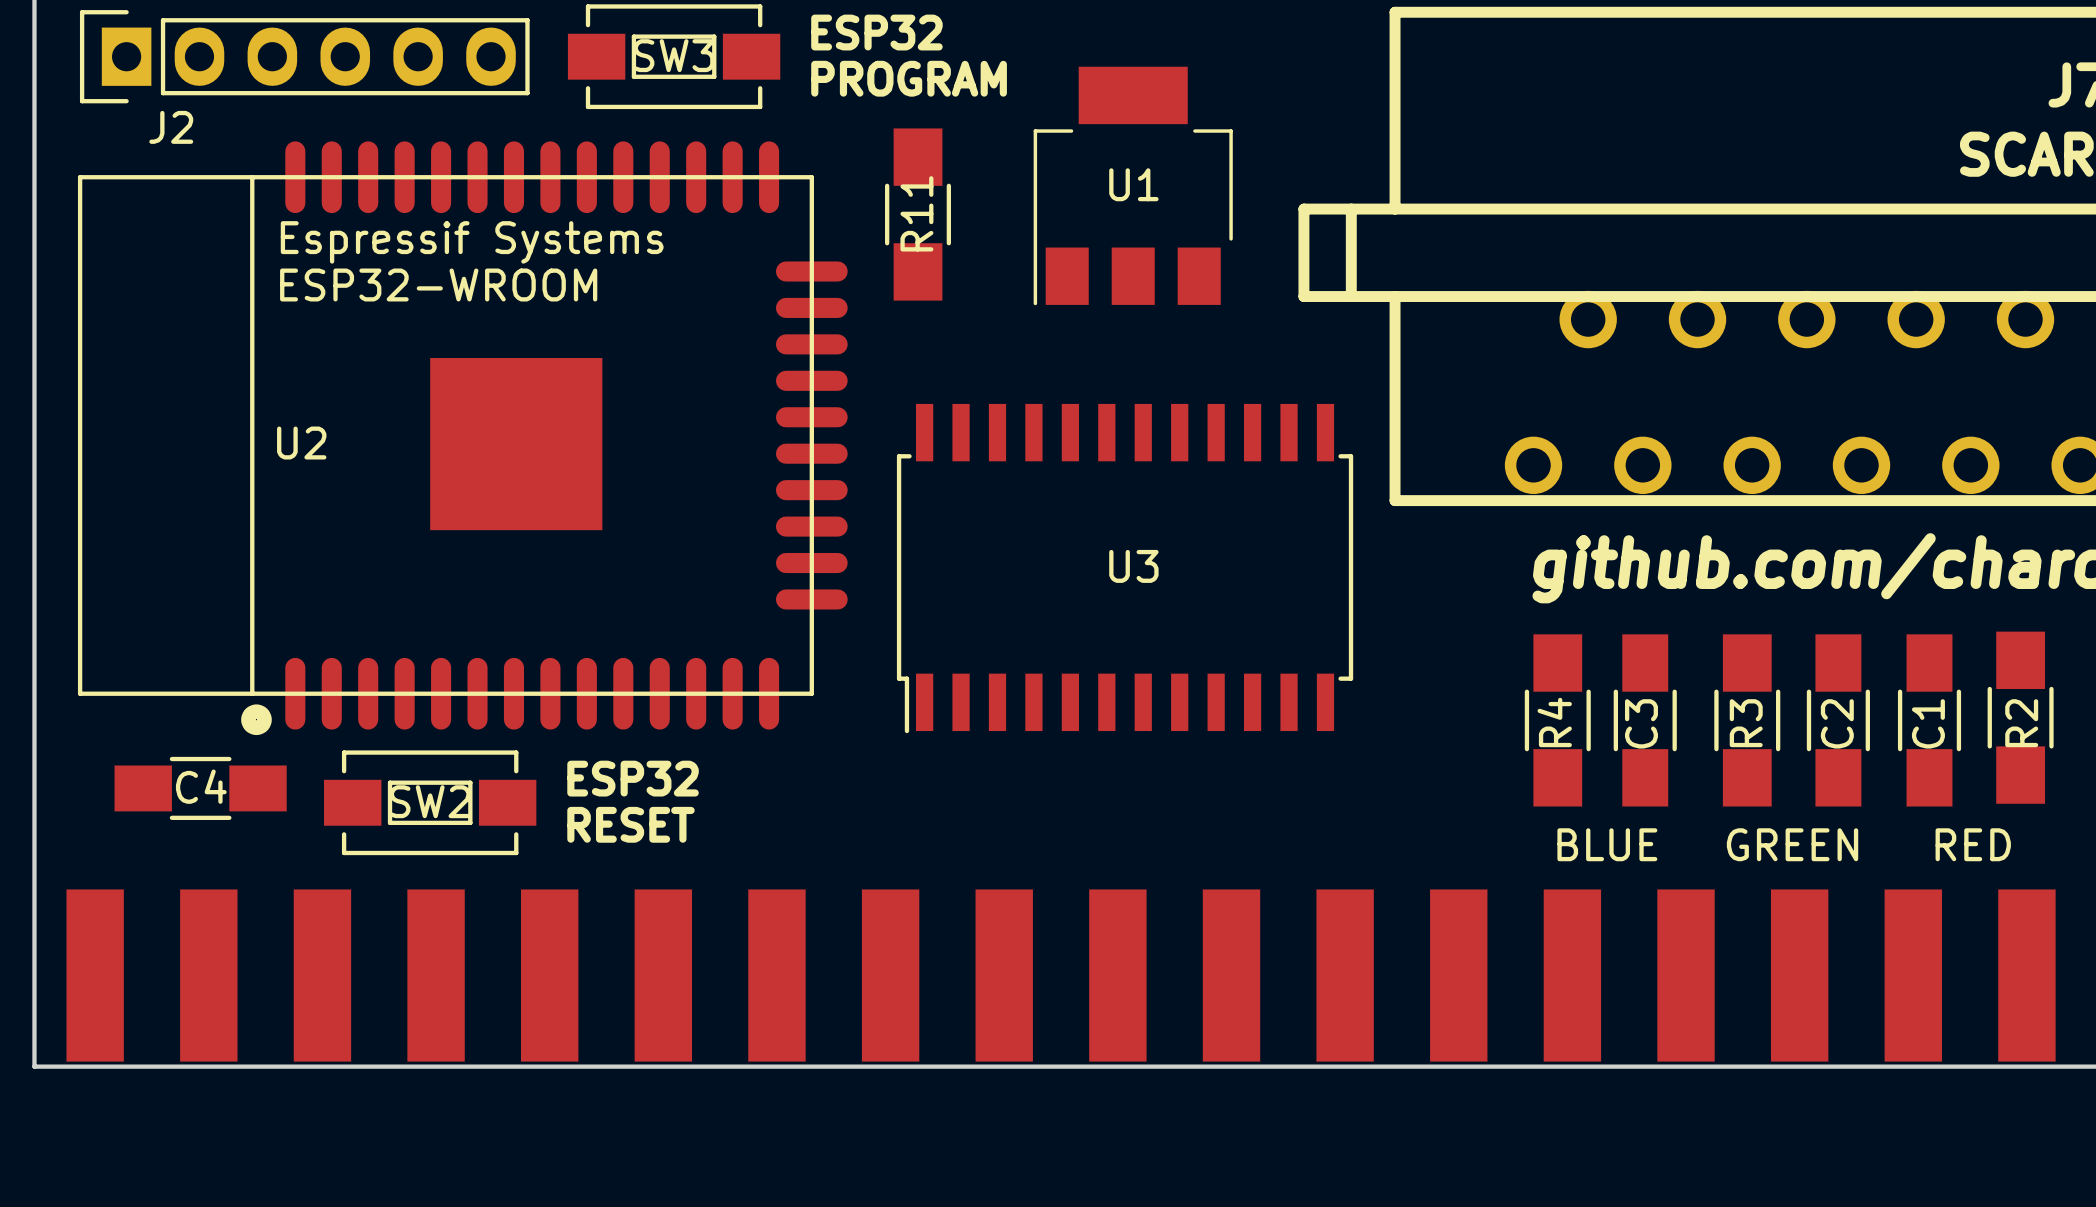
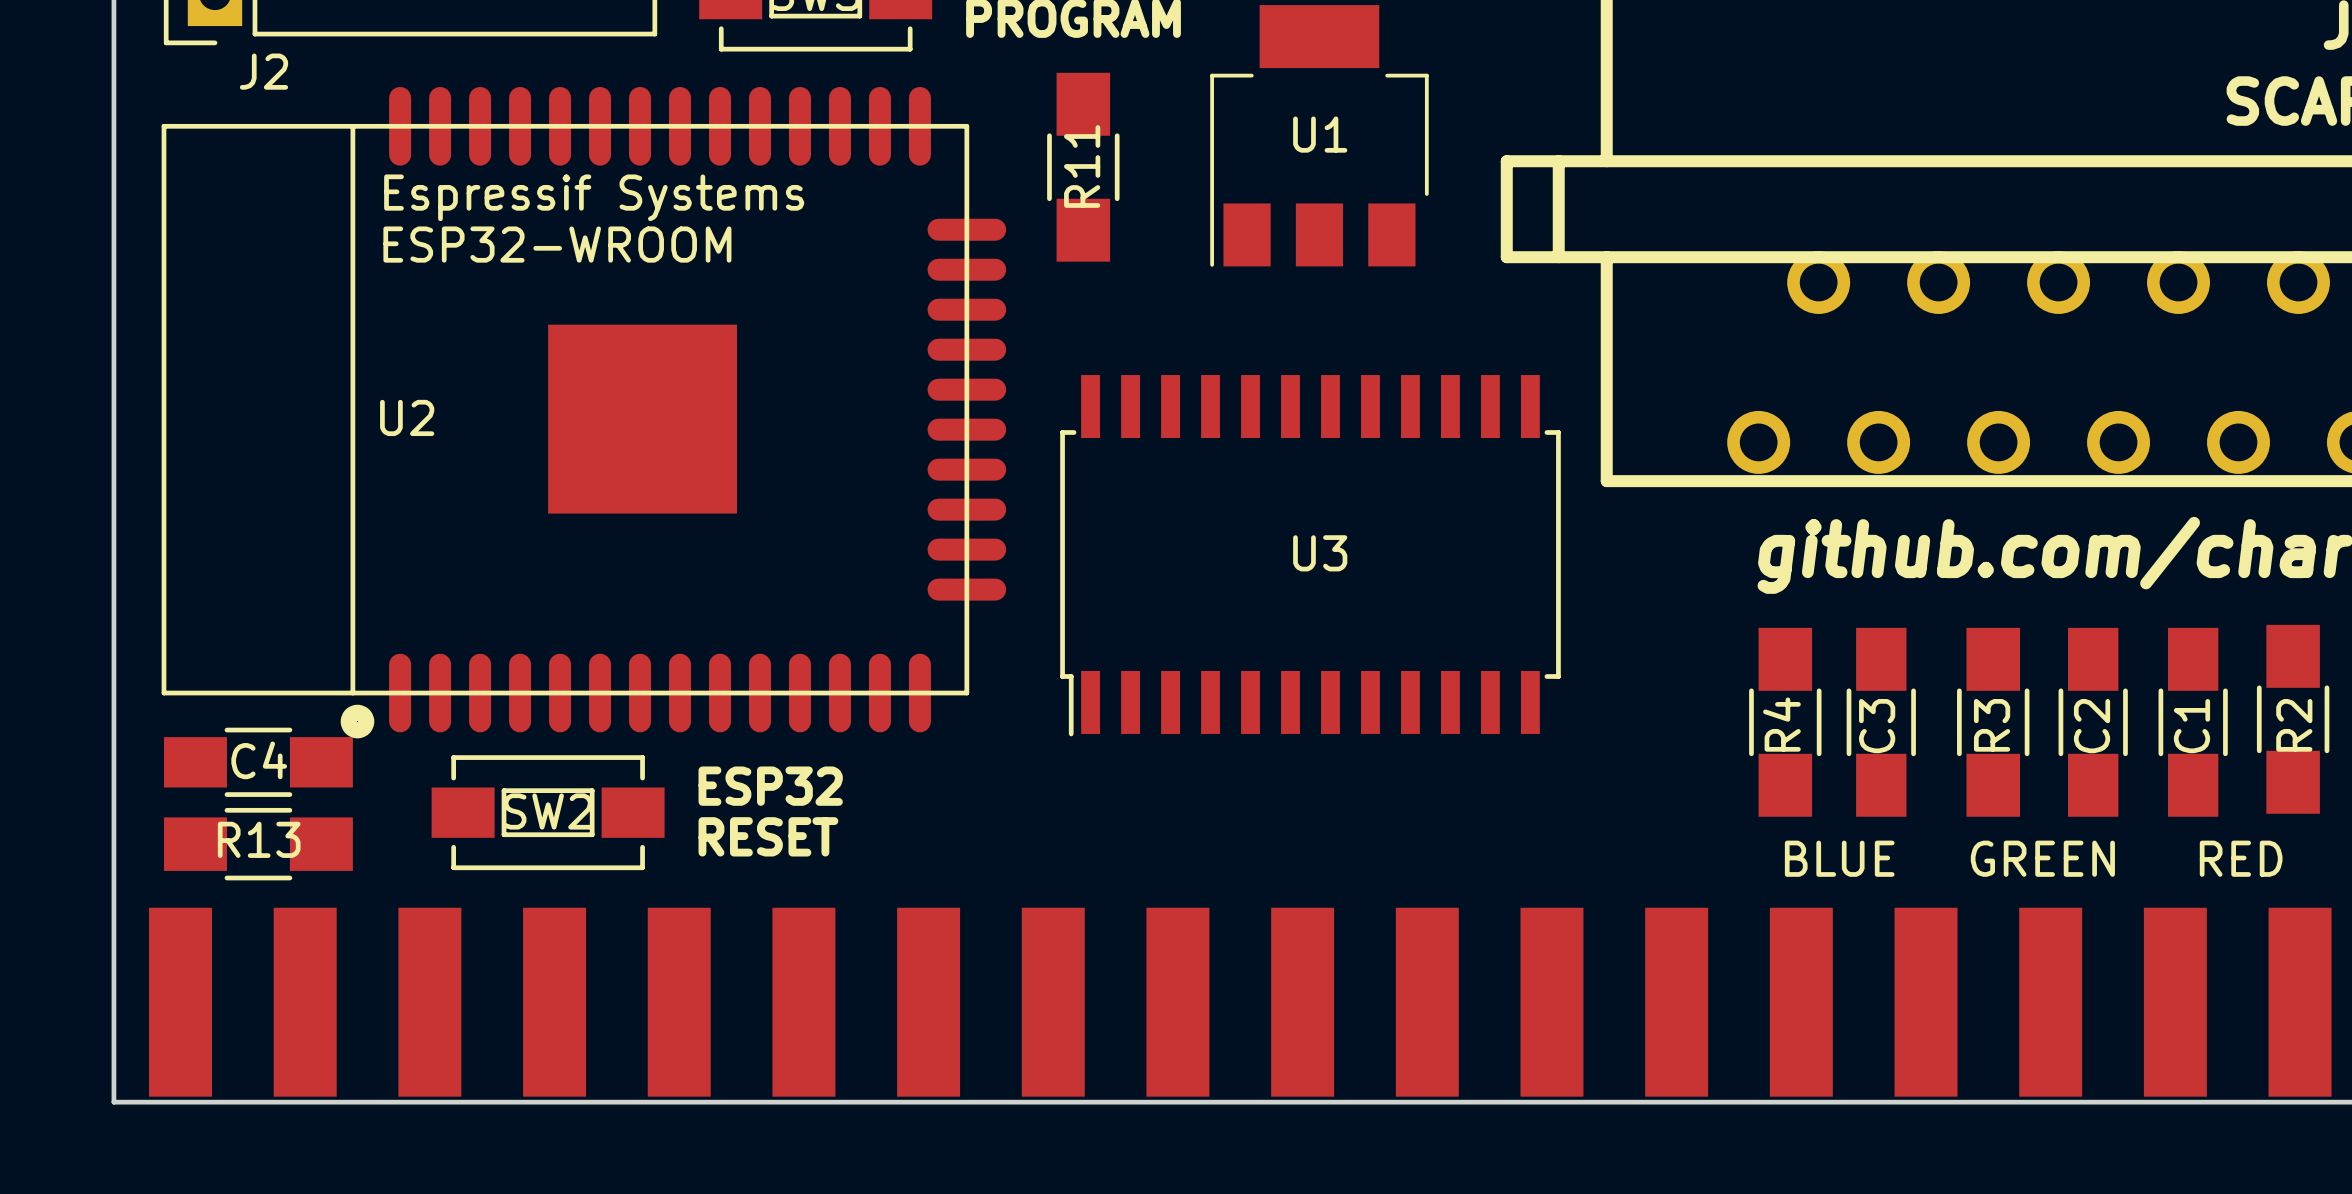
C4 position: (200, 788) -> (258, 762)
R13: none -> (258, 844)

